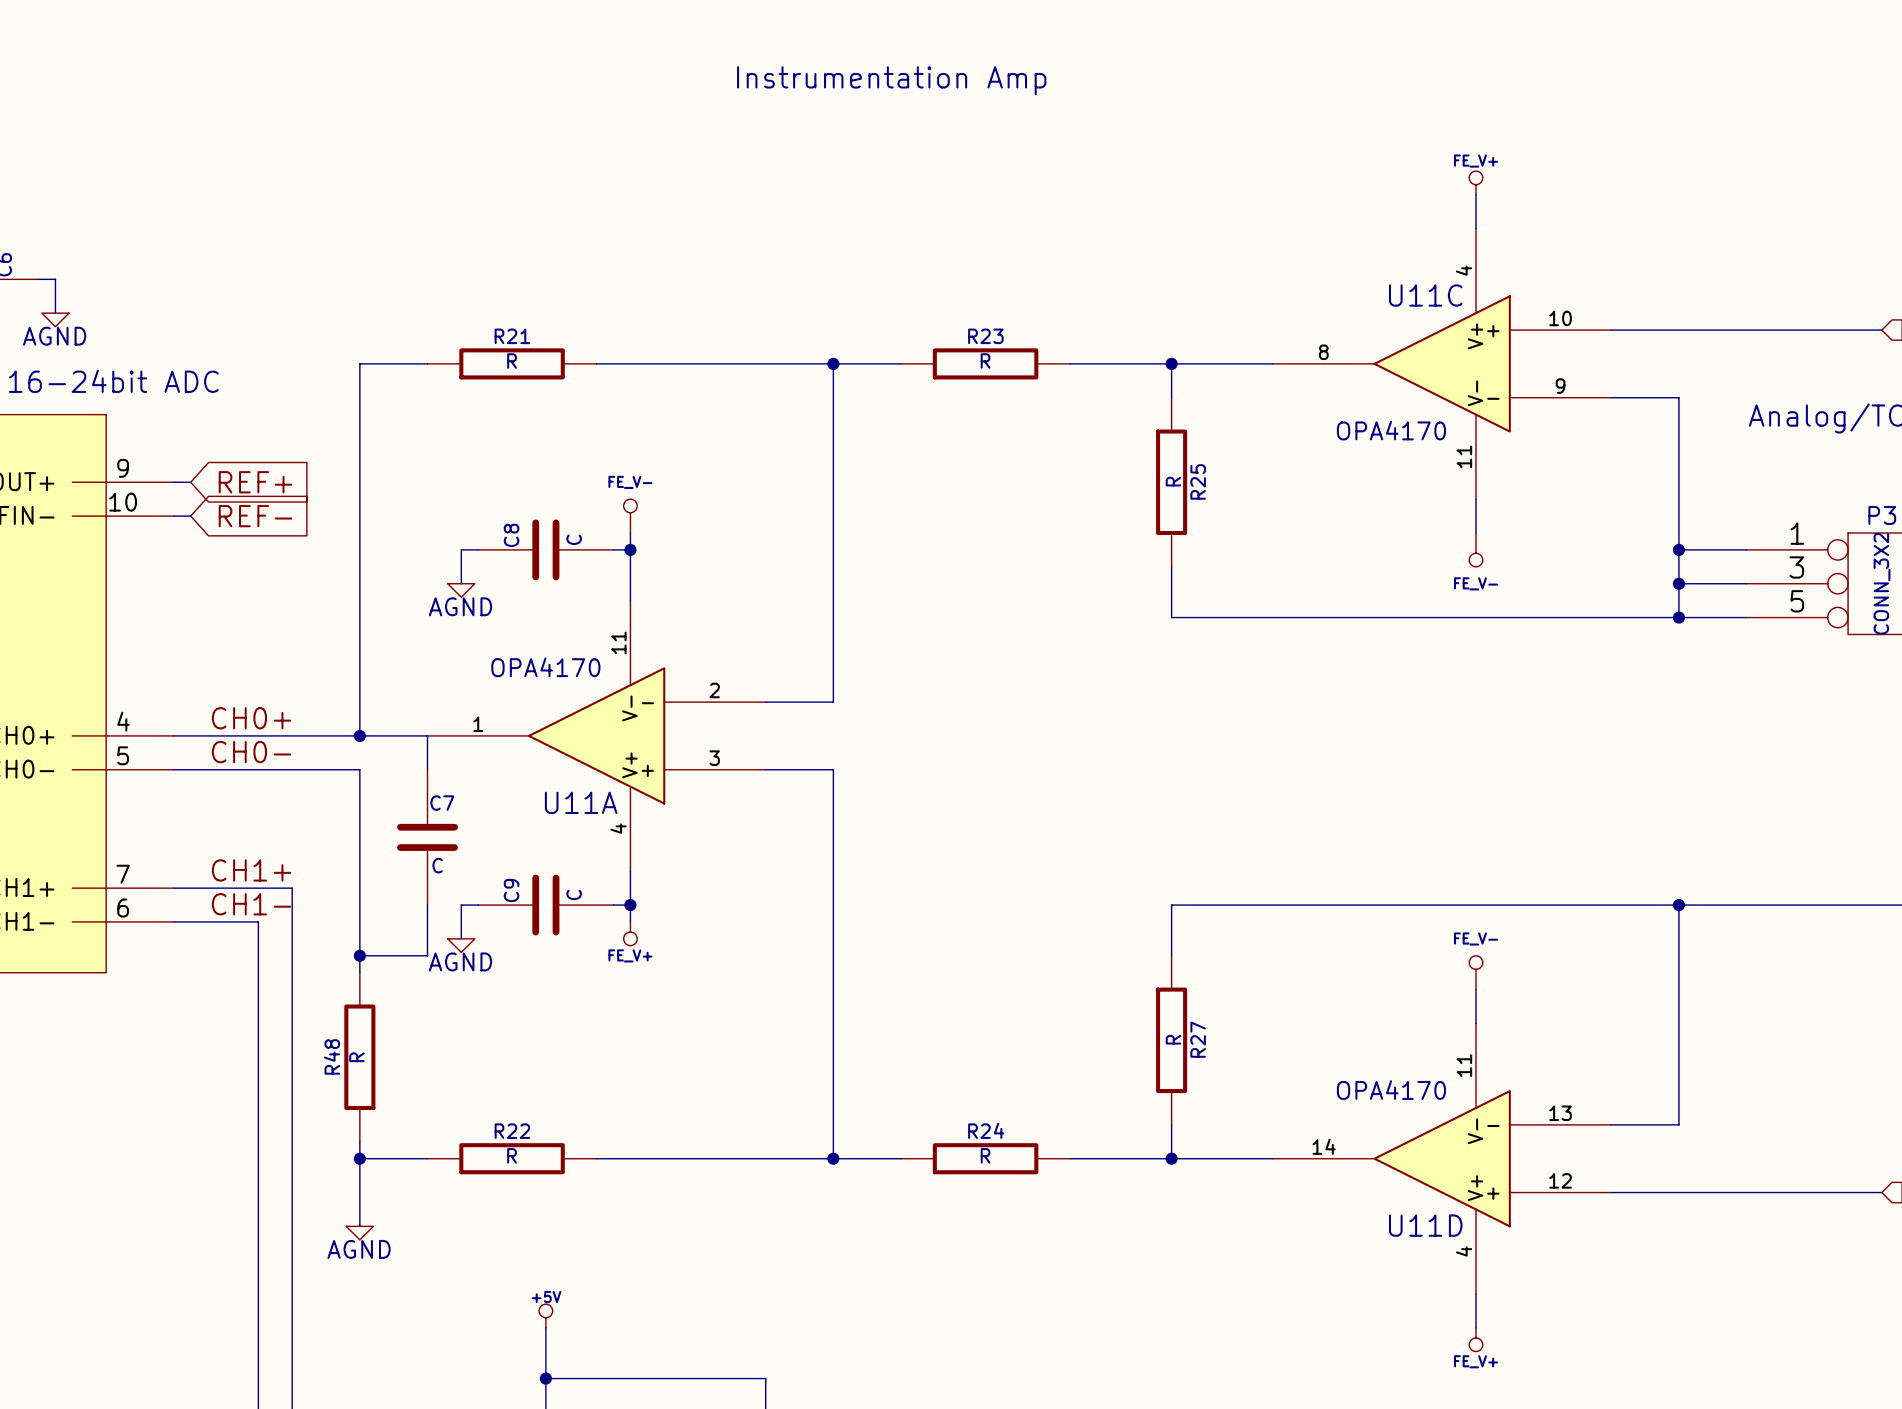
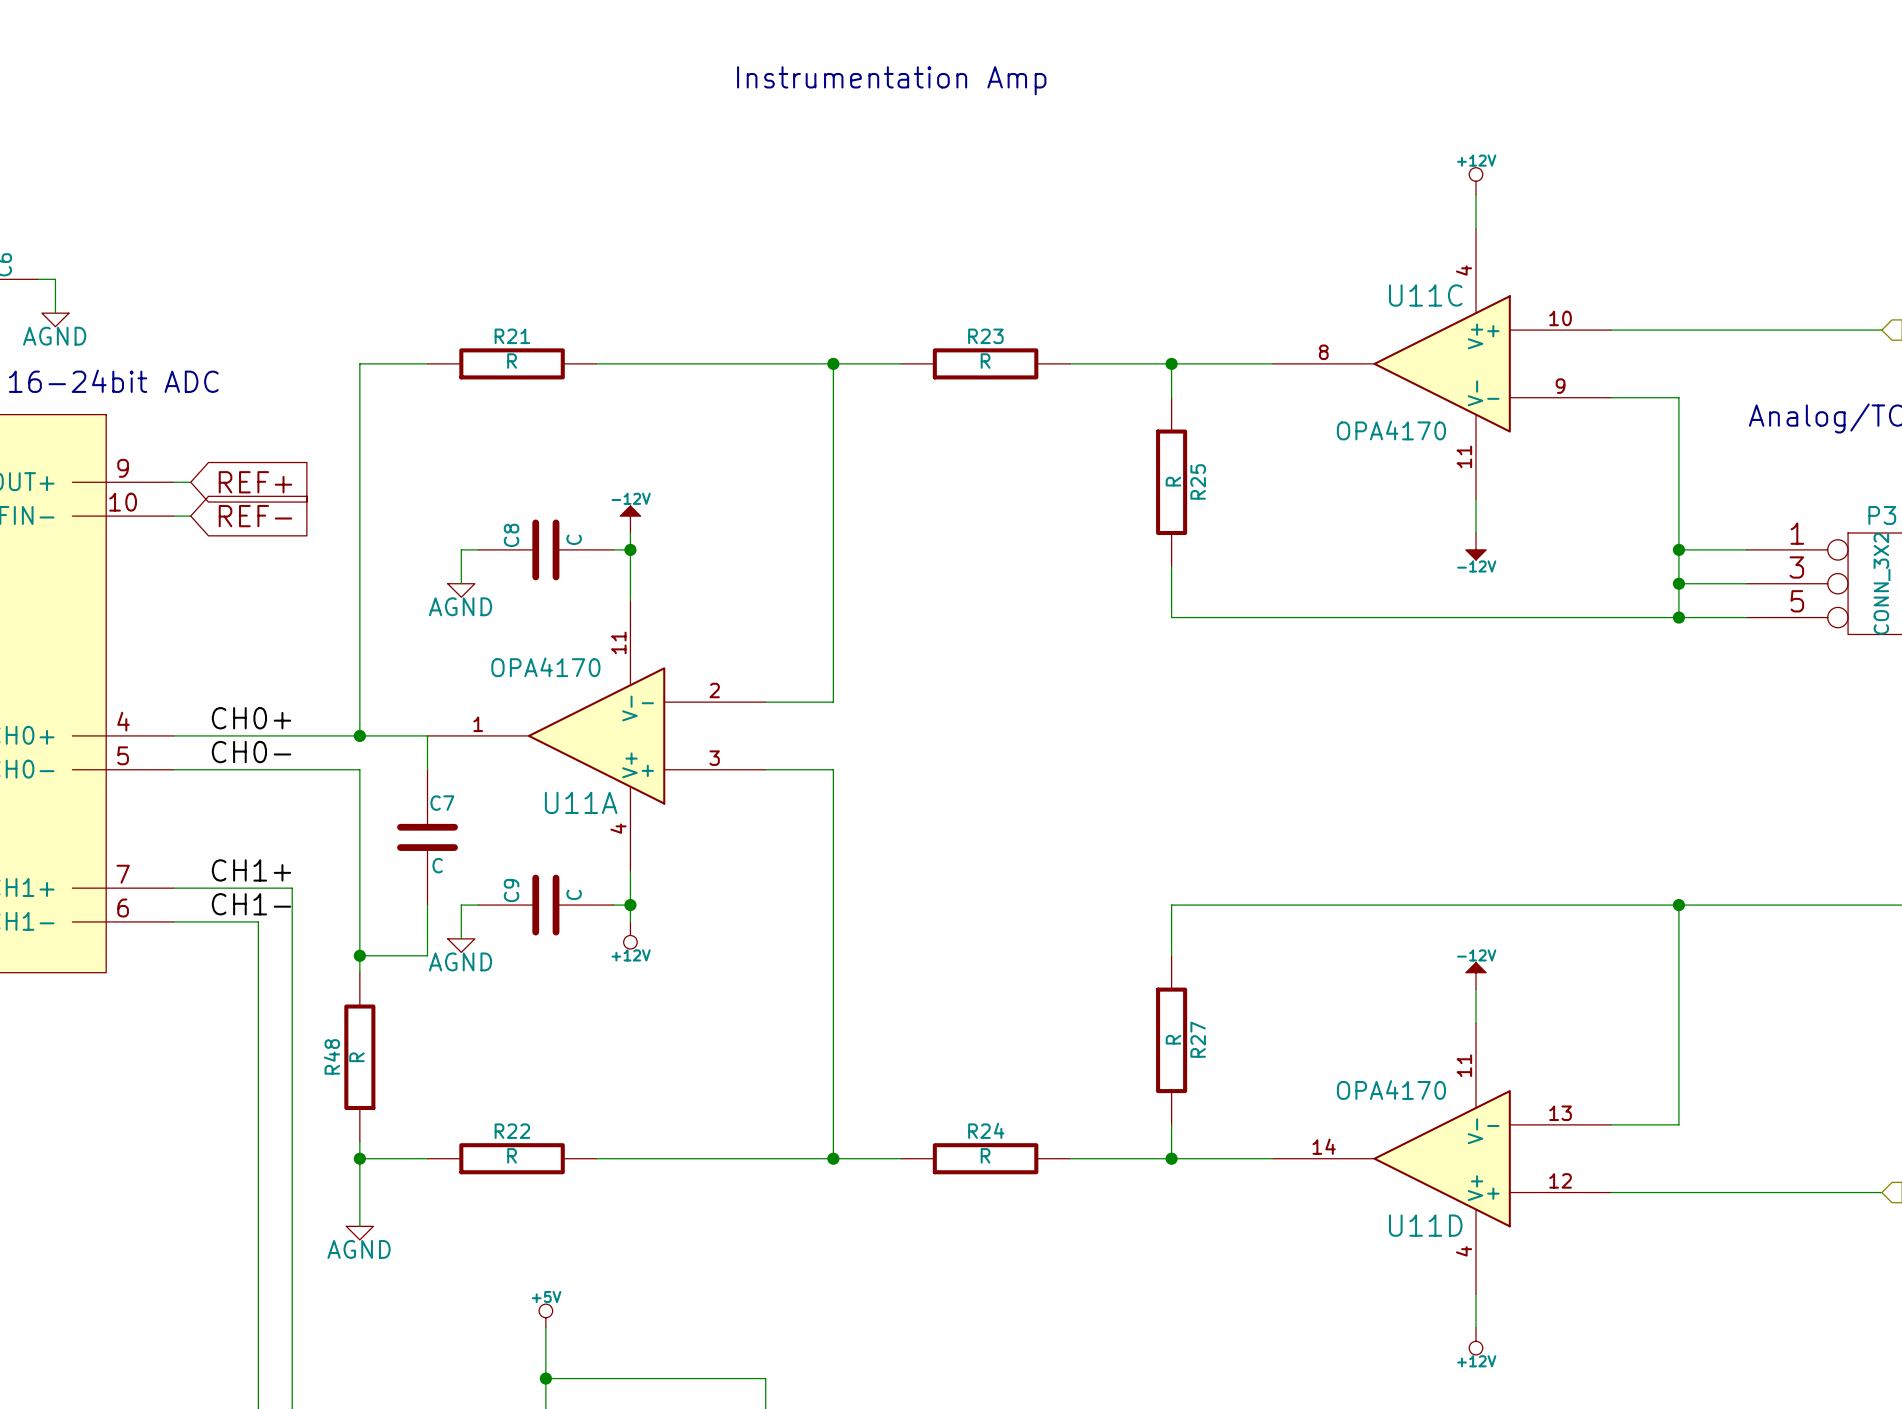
power symbol: FE_V+ (1476, 182) -> +12V (1476, 181)
power symbol: FE_V- (630, 516) -> -12V (630, 519)
power symbol: FE_V- (1476, 549) -> -12V (1476, 546)
power symbol: FE_V+ (630, 933) -> +12V (630, 935)
power symbol: FE_V- (1476, 972) -> -12V (1476, 976)
power symbol: FE_V+ (1476, 1339) -> +12V (1476, 1341)

